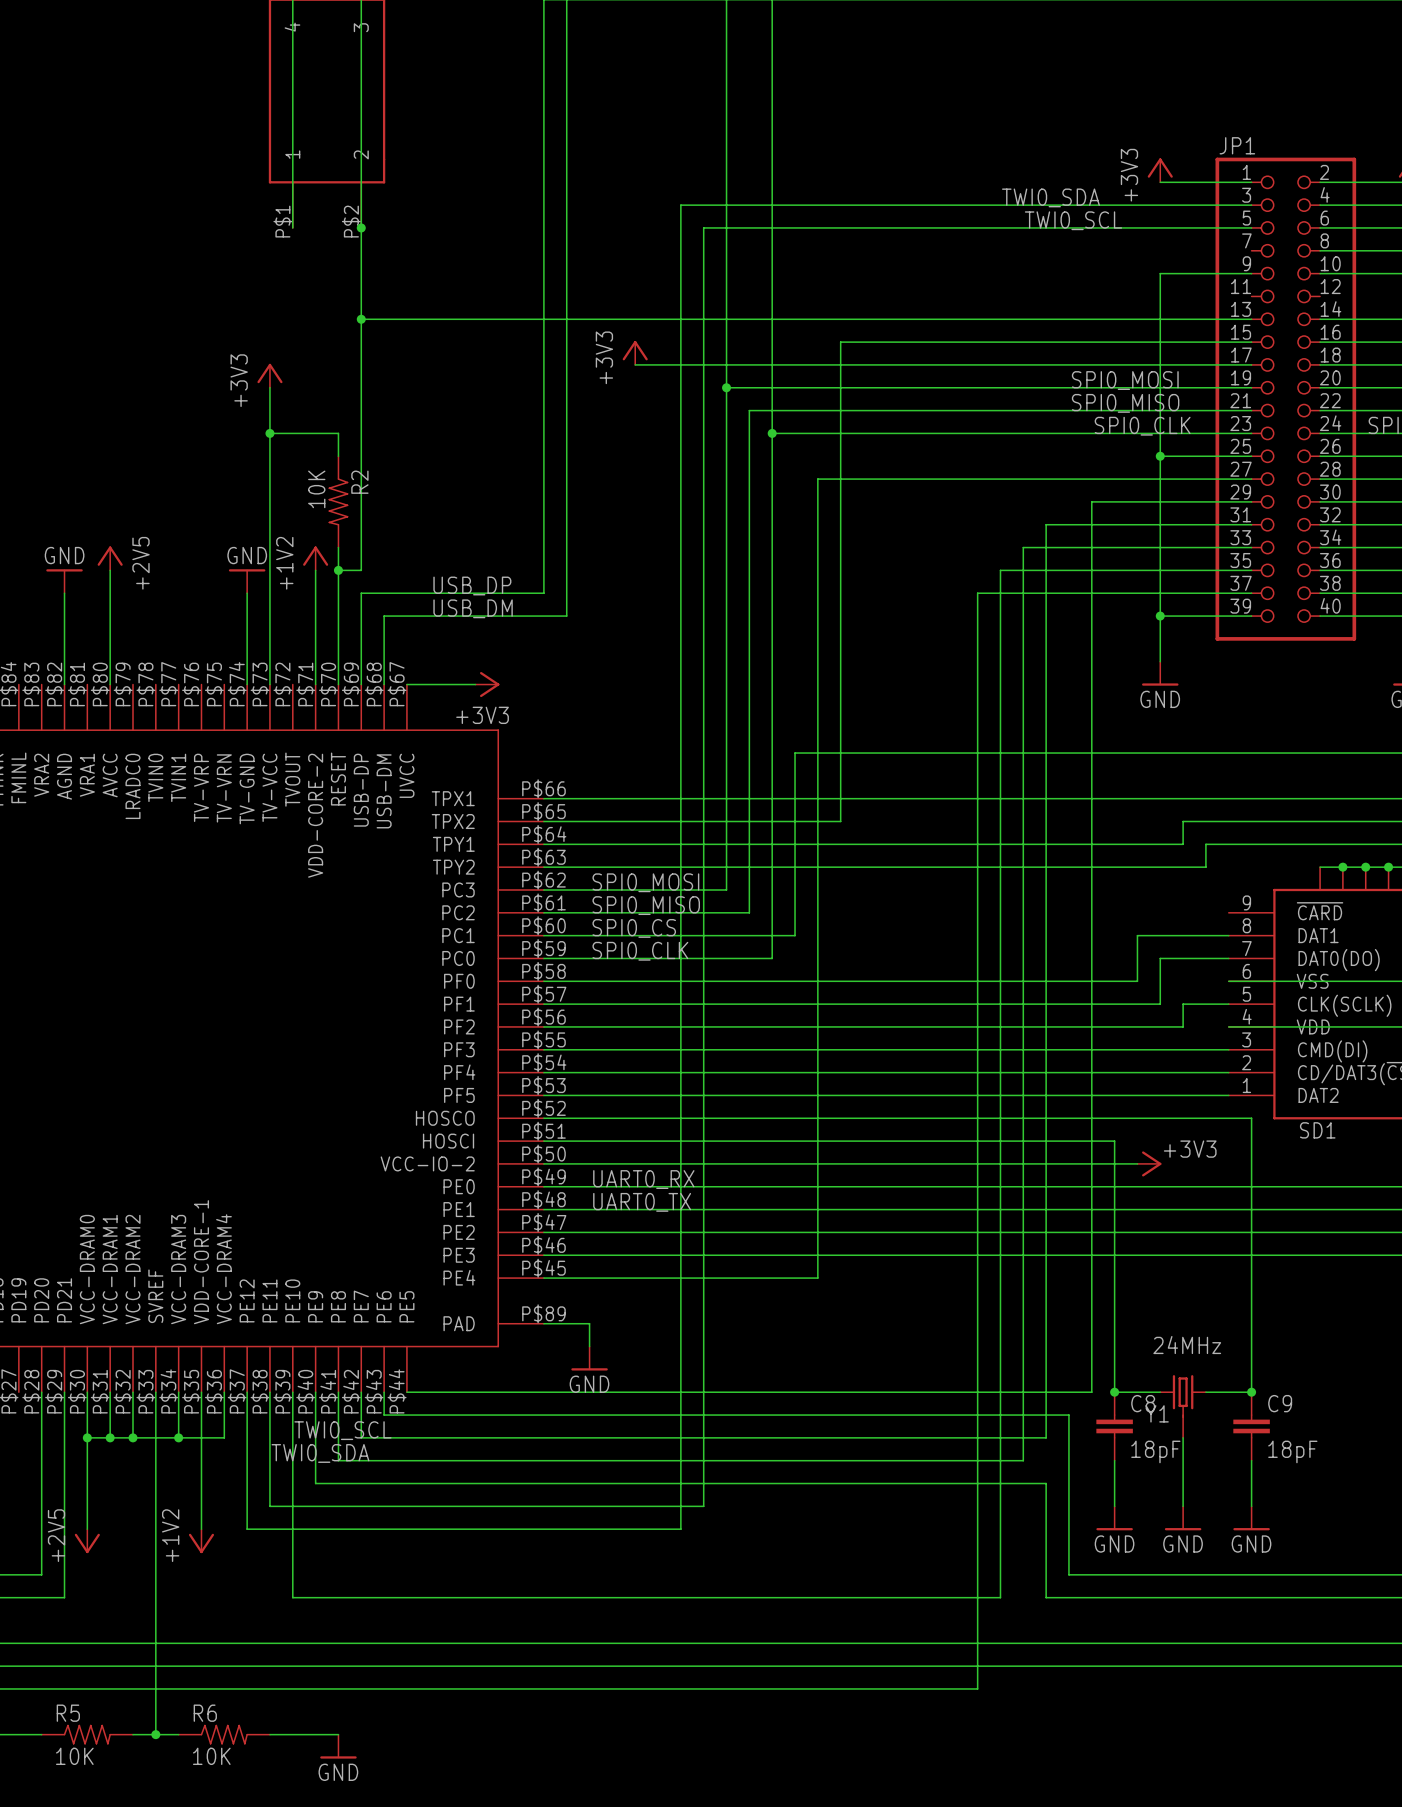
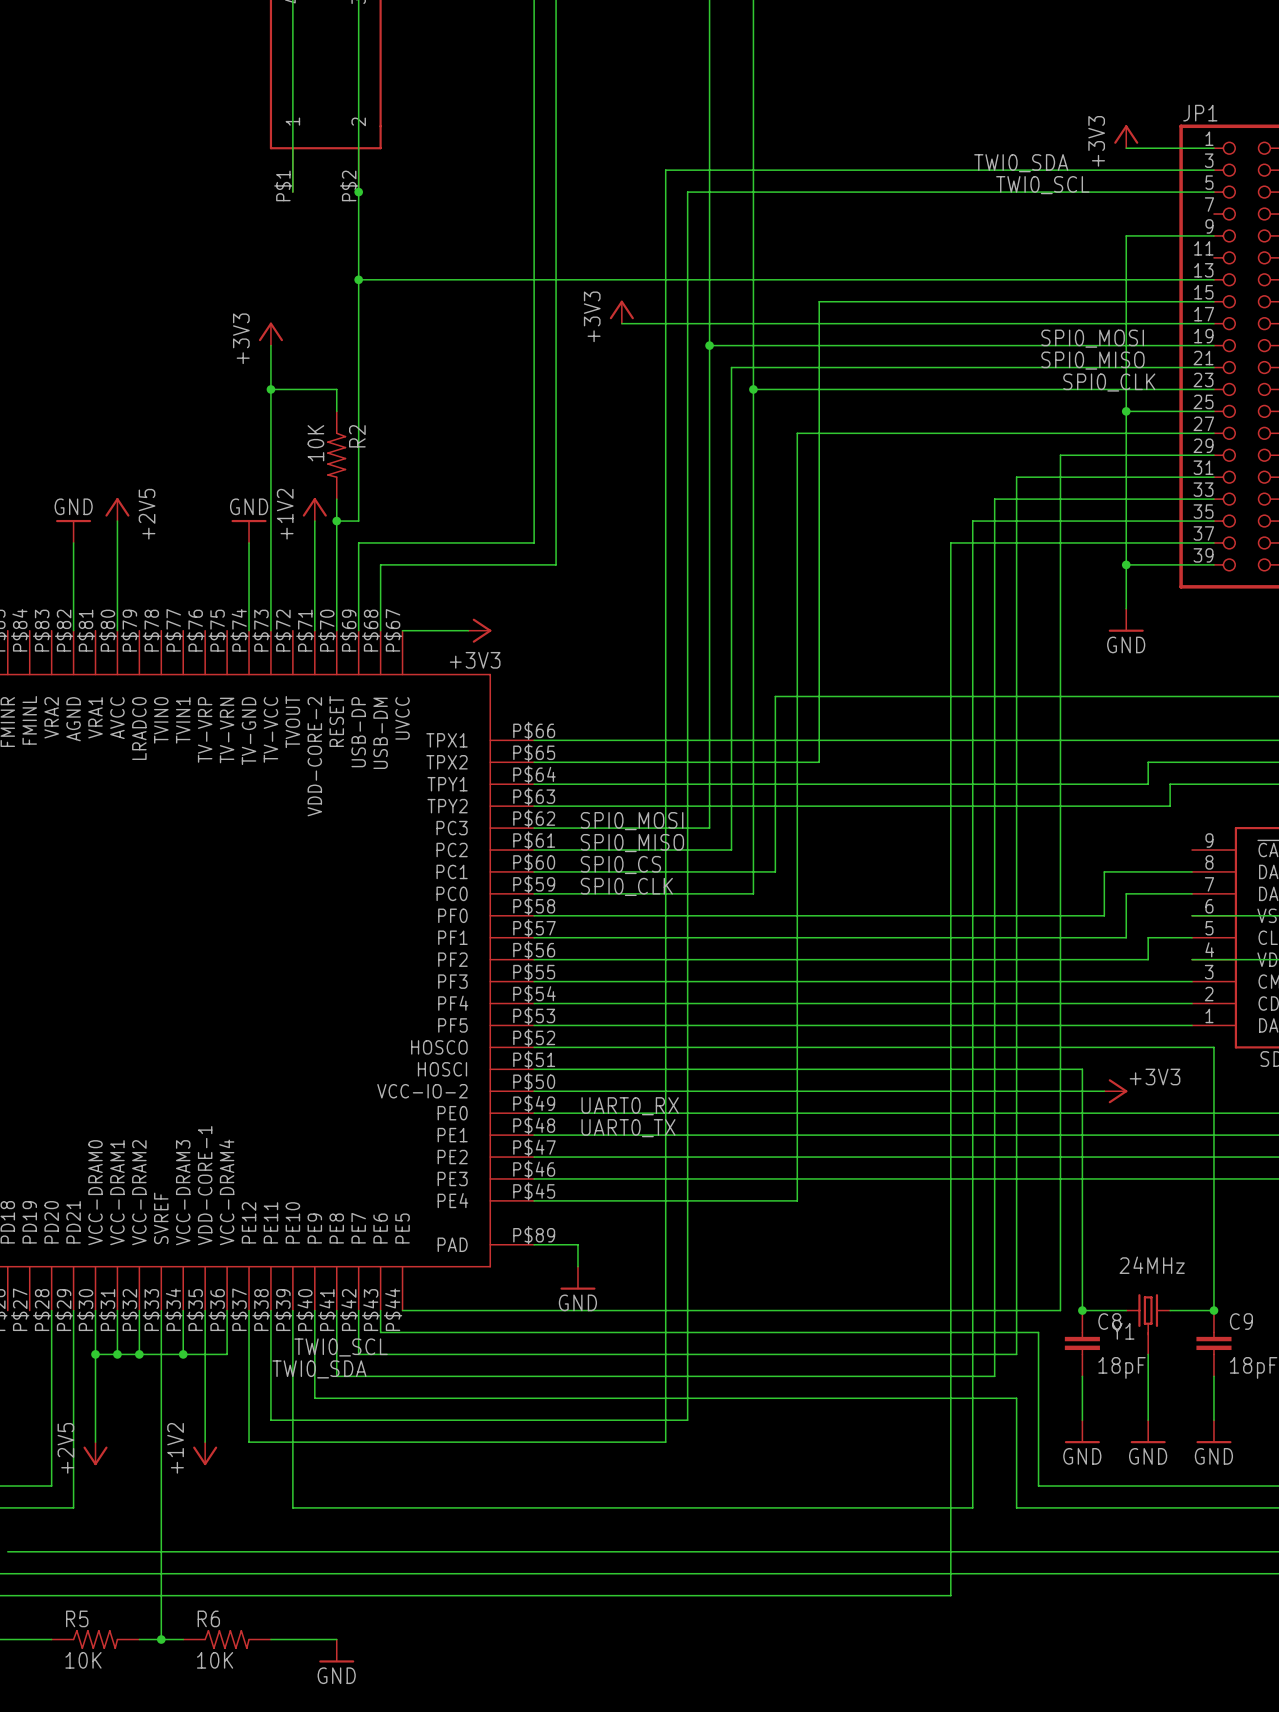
label: USB_DP (472, 585) -> none
label: USB_DM (473, 608) -> none

